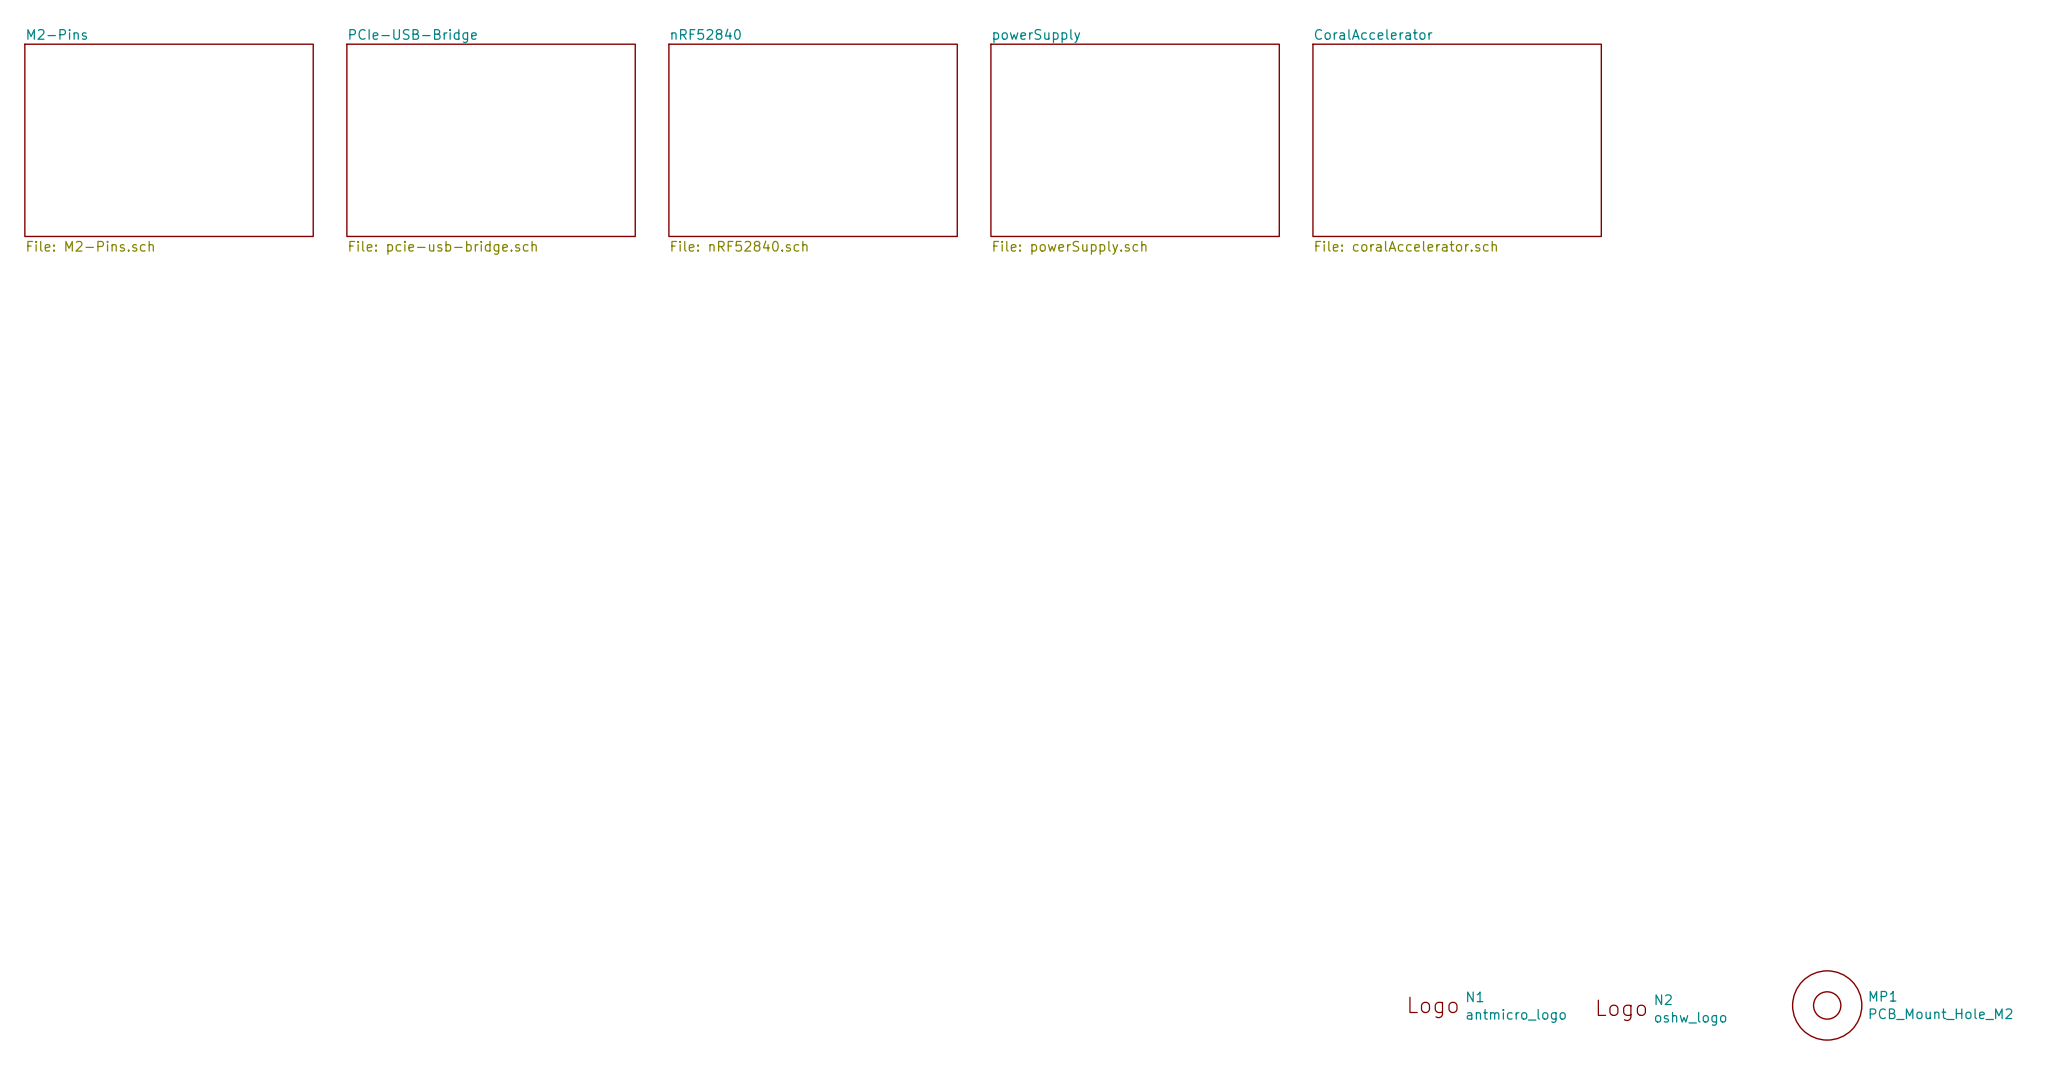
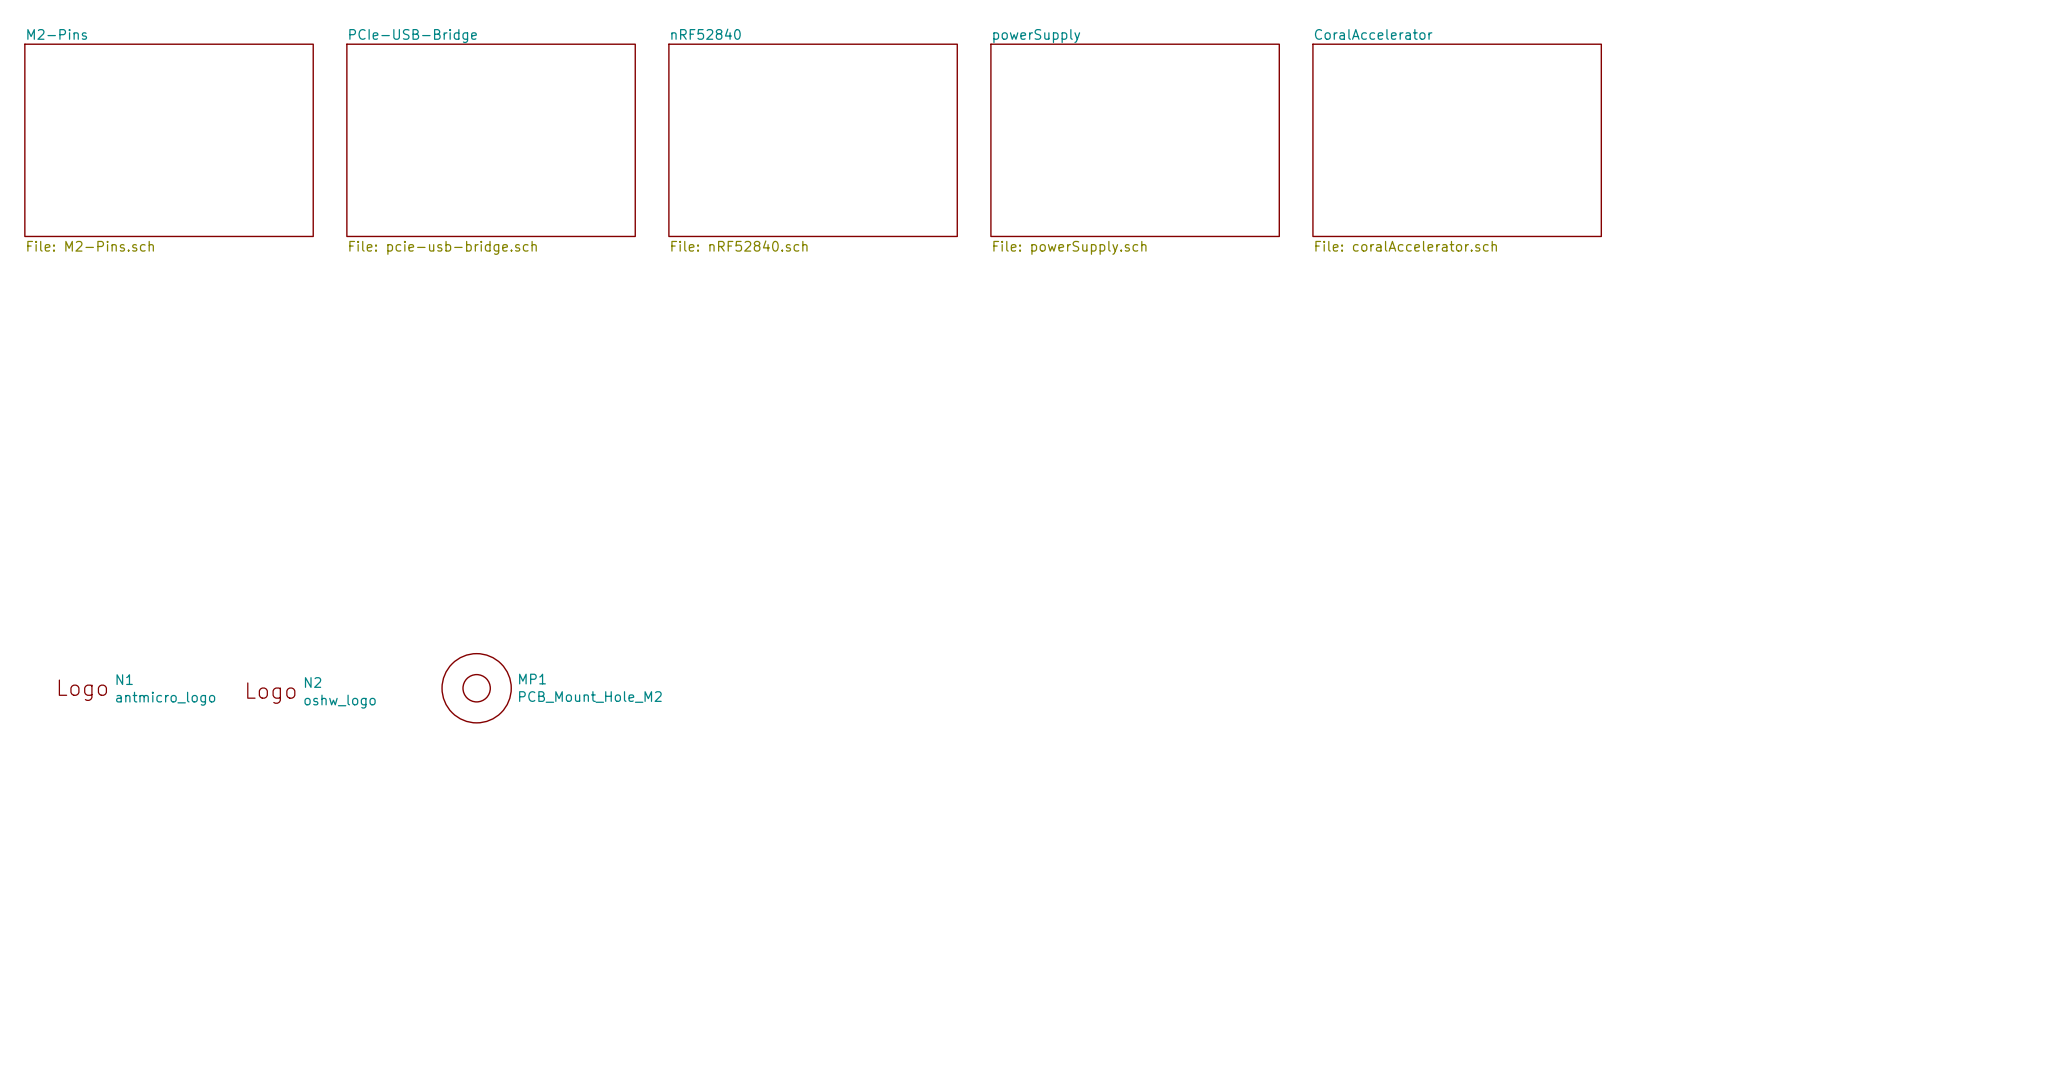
MP1 position: (1827, 1005) -> (476, 688)
N1 position: (1487, 1007) -> (136, 689)
N2 position: (1662, 1010) -> (311, 692)

